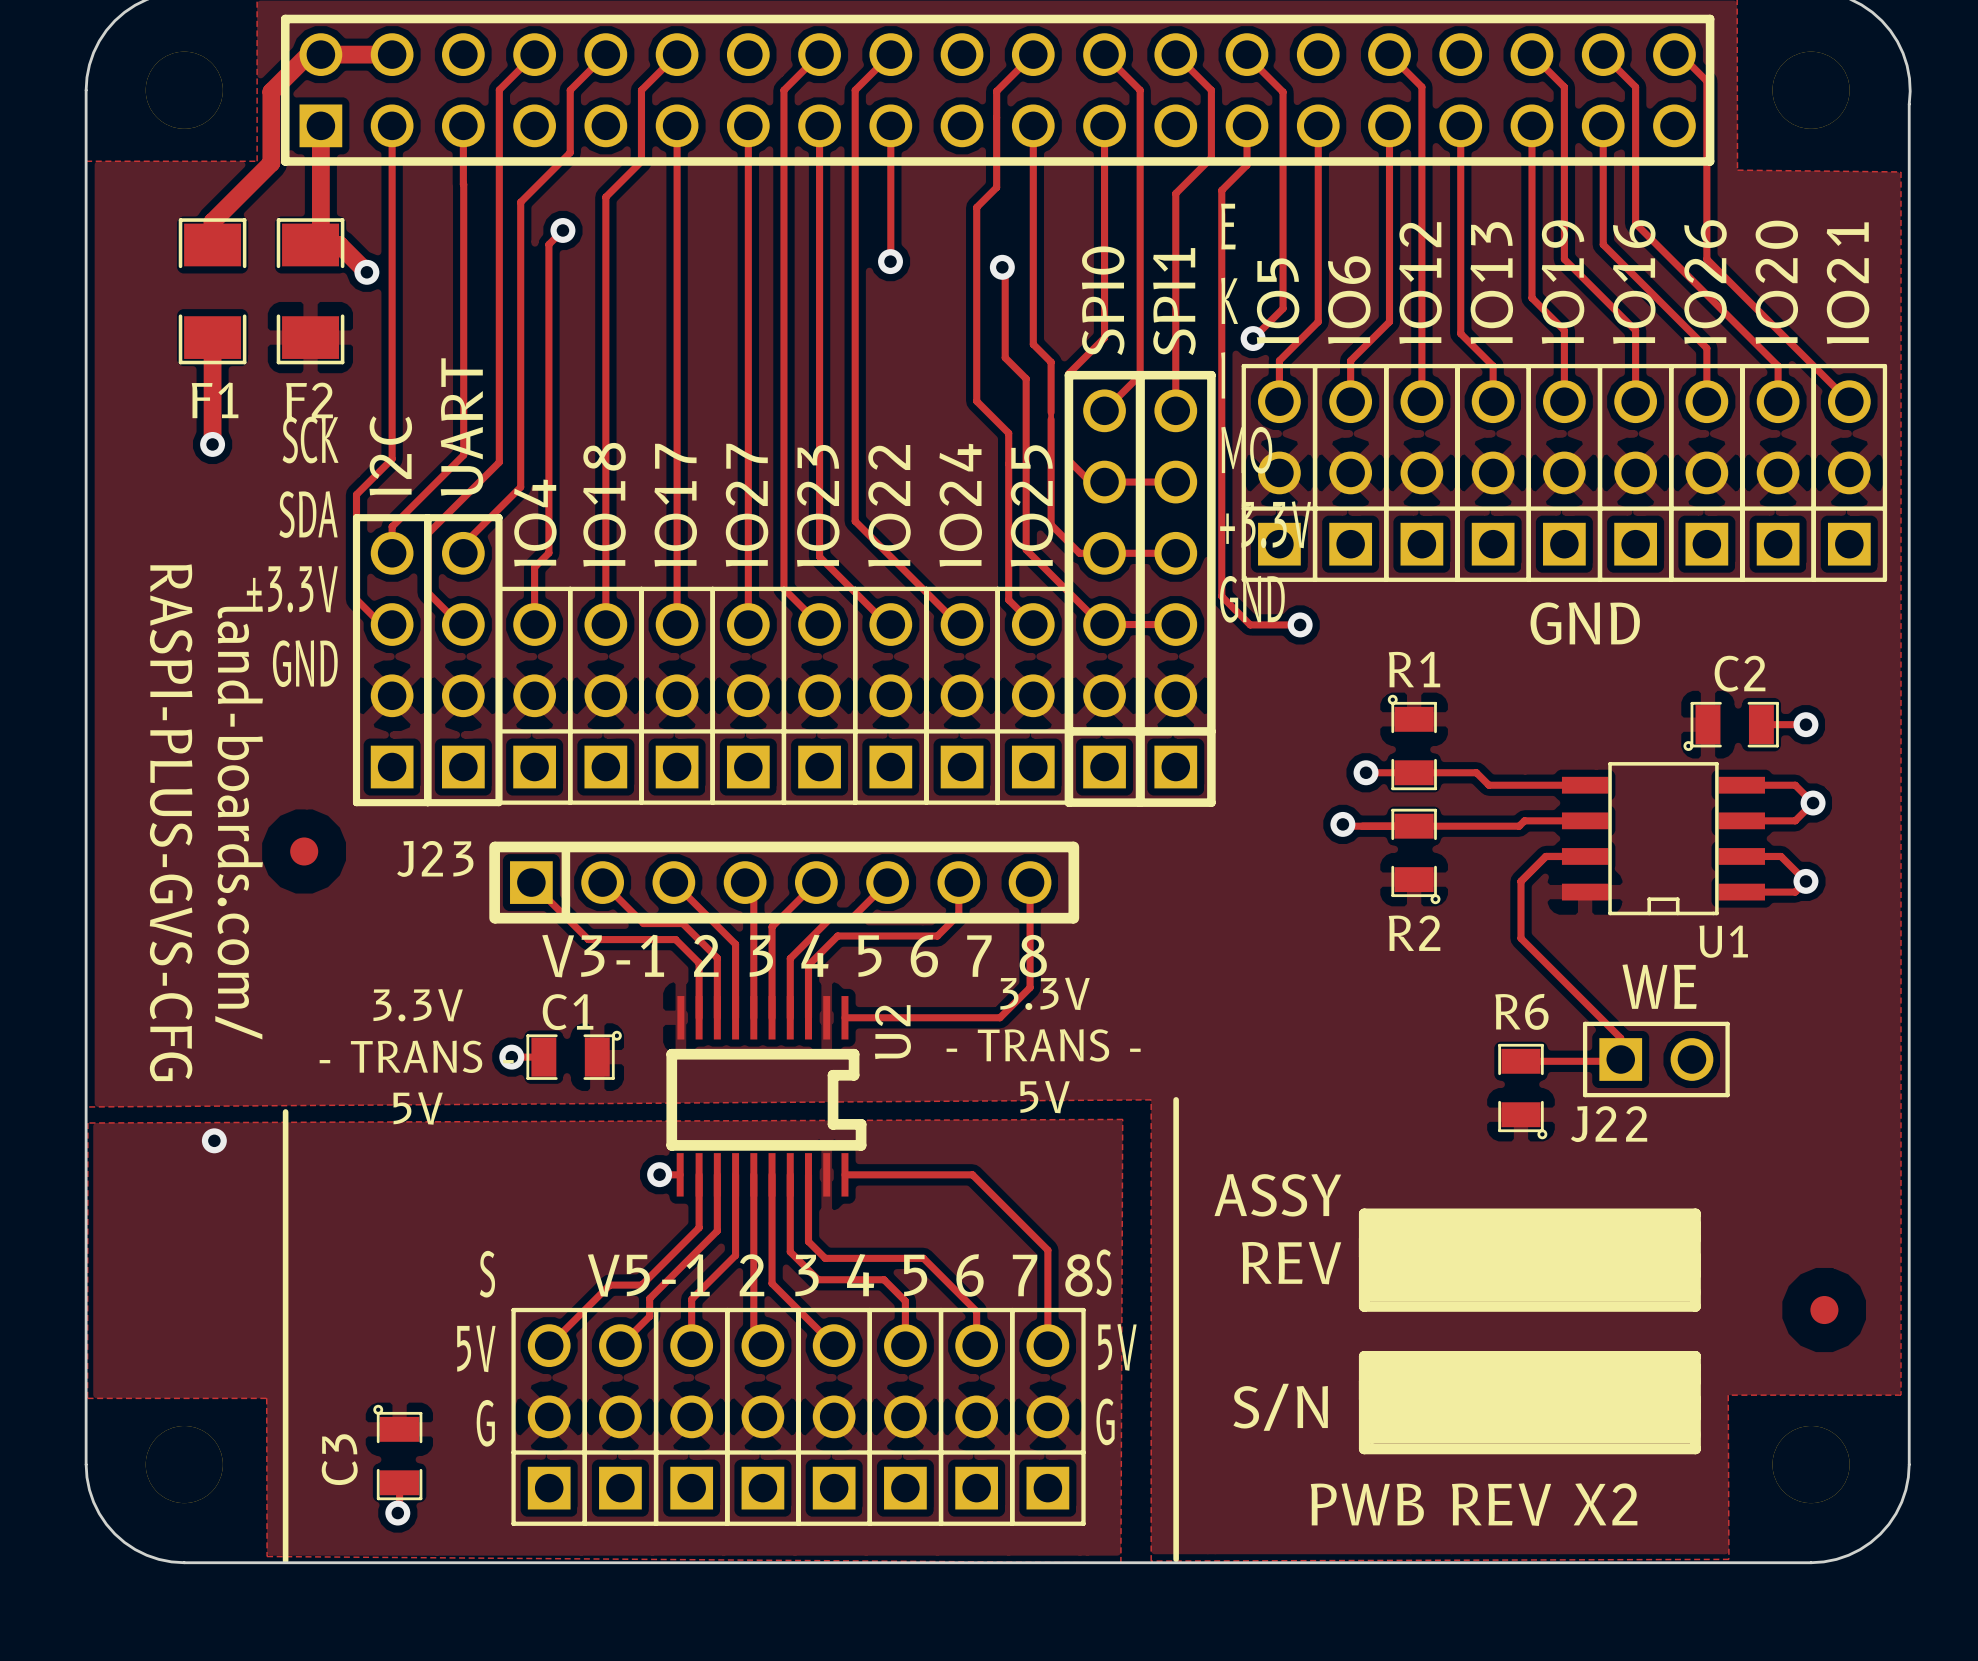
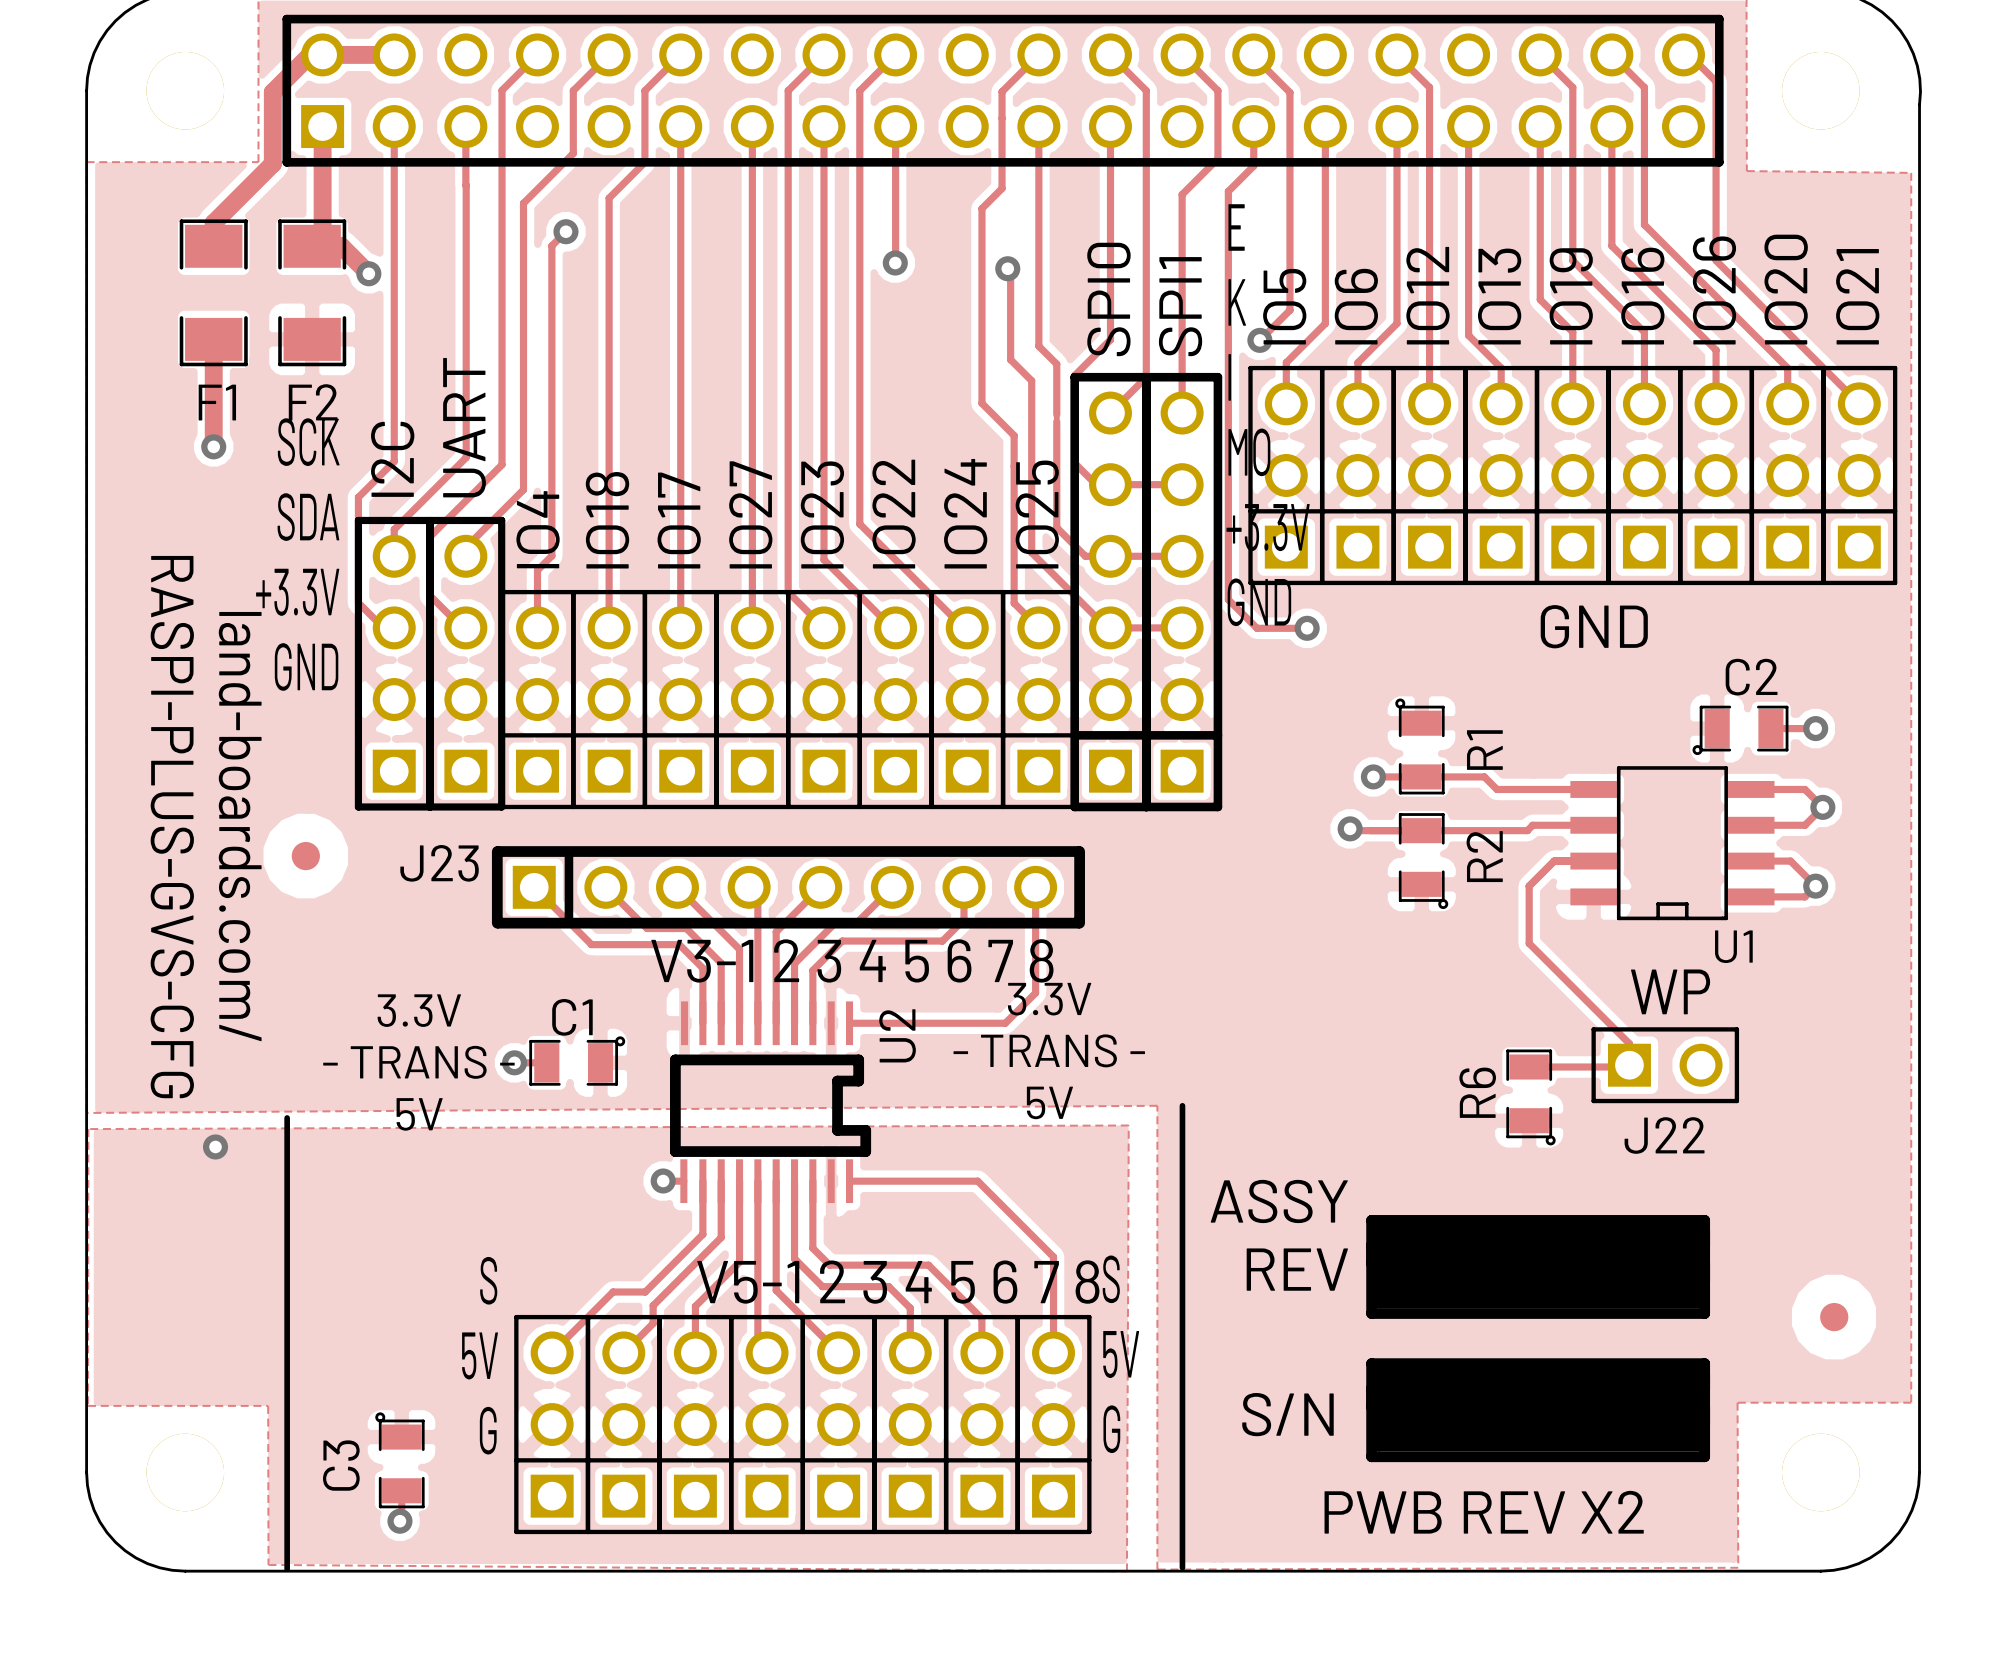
R1 name rotation: 0° (1414, 669) -> 90° counterclockwise (1484, 750)
R1 name position: R1 (1414, 669) -> R1 (1484, 750)
R2 name rotation: 0° (1414, 933) -> 90° counterclockwise (1484, 856)
R2 name position: R2 (1414, 933) -> R2 (1484, 856)
text: WE (1659, 986) -> WP (1670, 991)
R6 name rotation: 0° (1521, 1011) -> 90° counterclockwise (1477, 1092)
R6 name position: R6 (1521, 1011) -> R6 (1477, 1092)
J22 name position: J22 (1609, 1124) -> J22 (1664, 1135)

